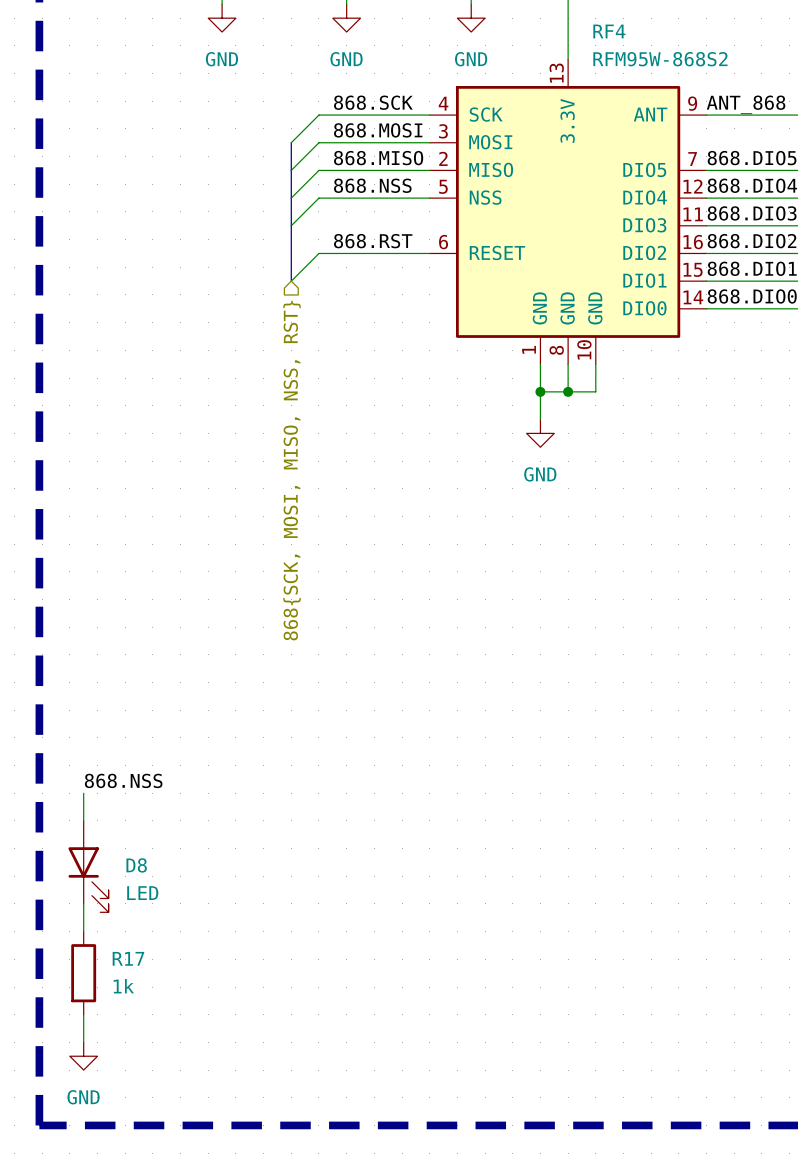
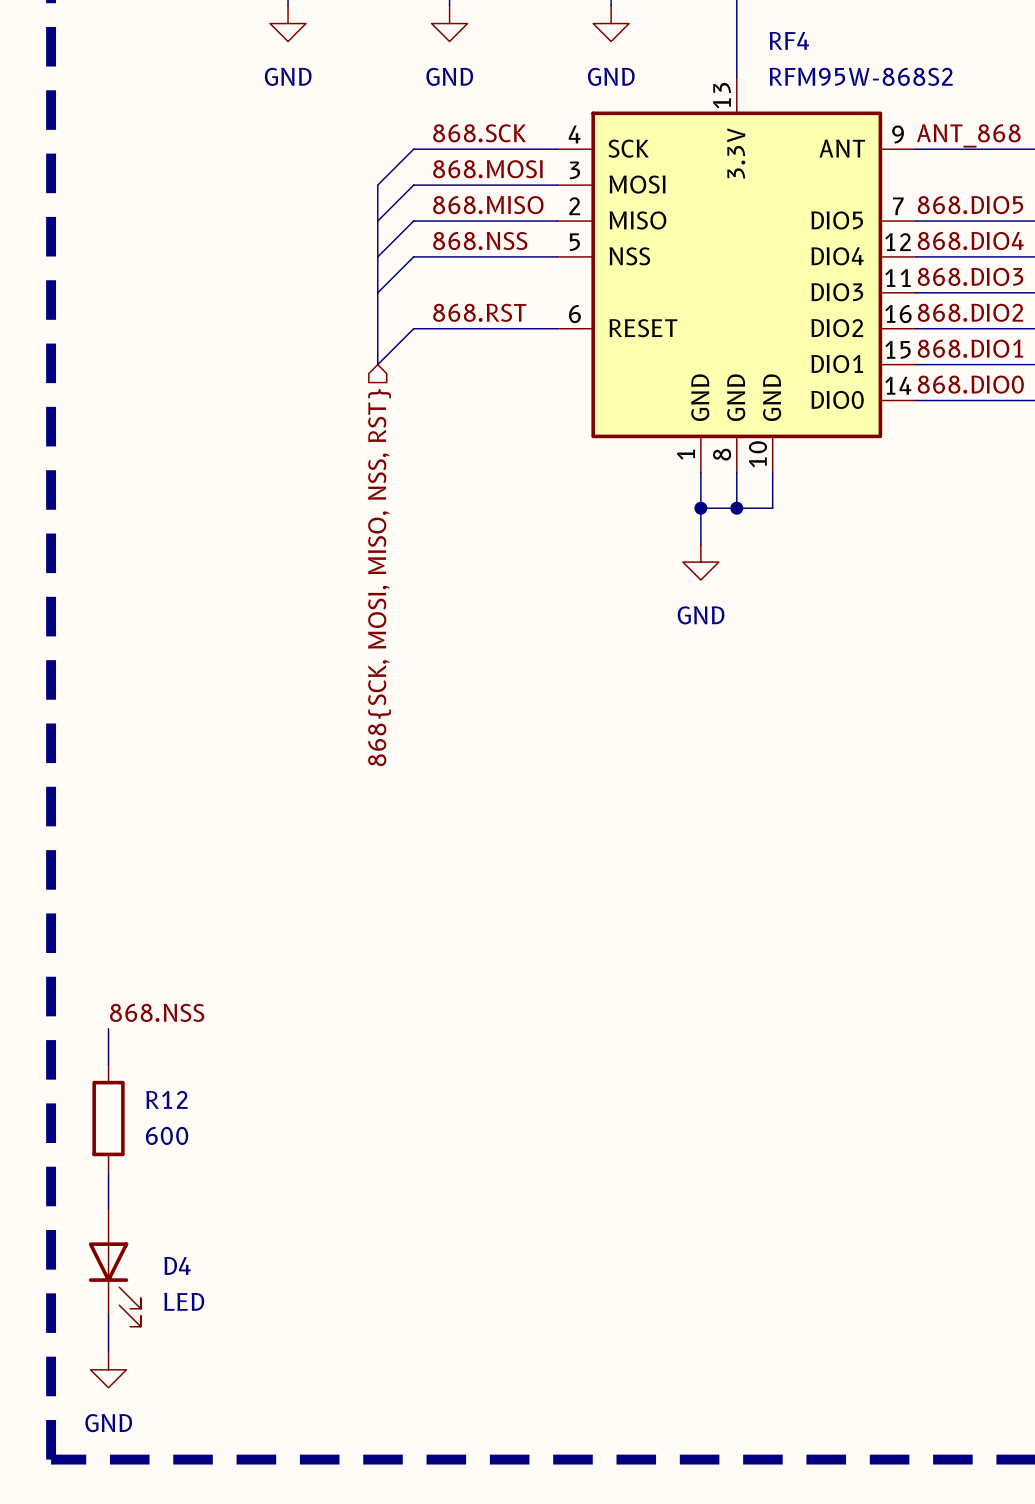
R12: none -> 600 (108, 1118)
D8: LED (88, 866) -> none
R17: 1k (83, 973) -> none
D4: none -> LED (114, 1267)

